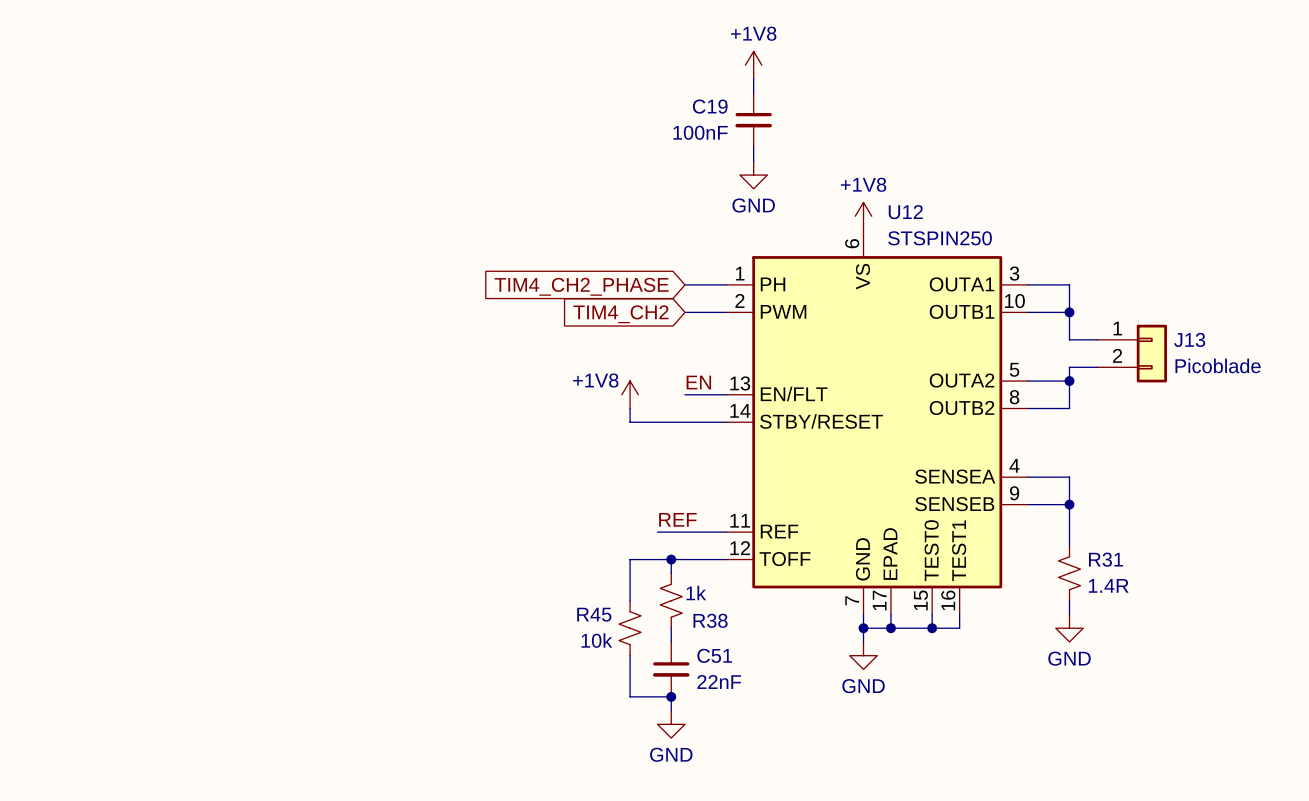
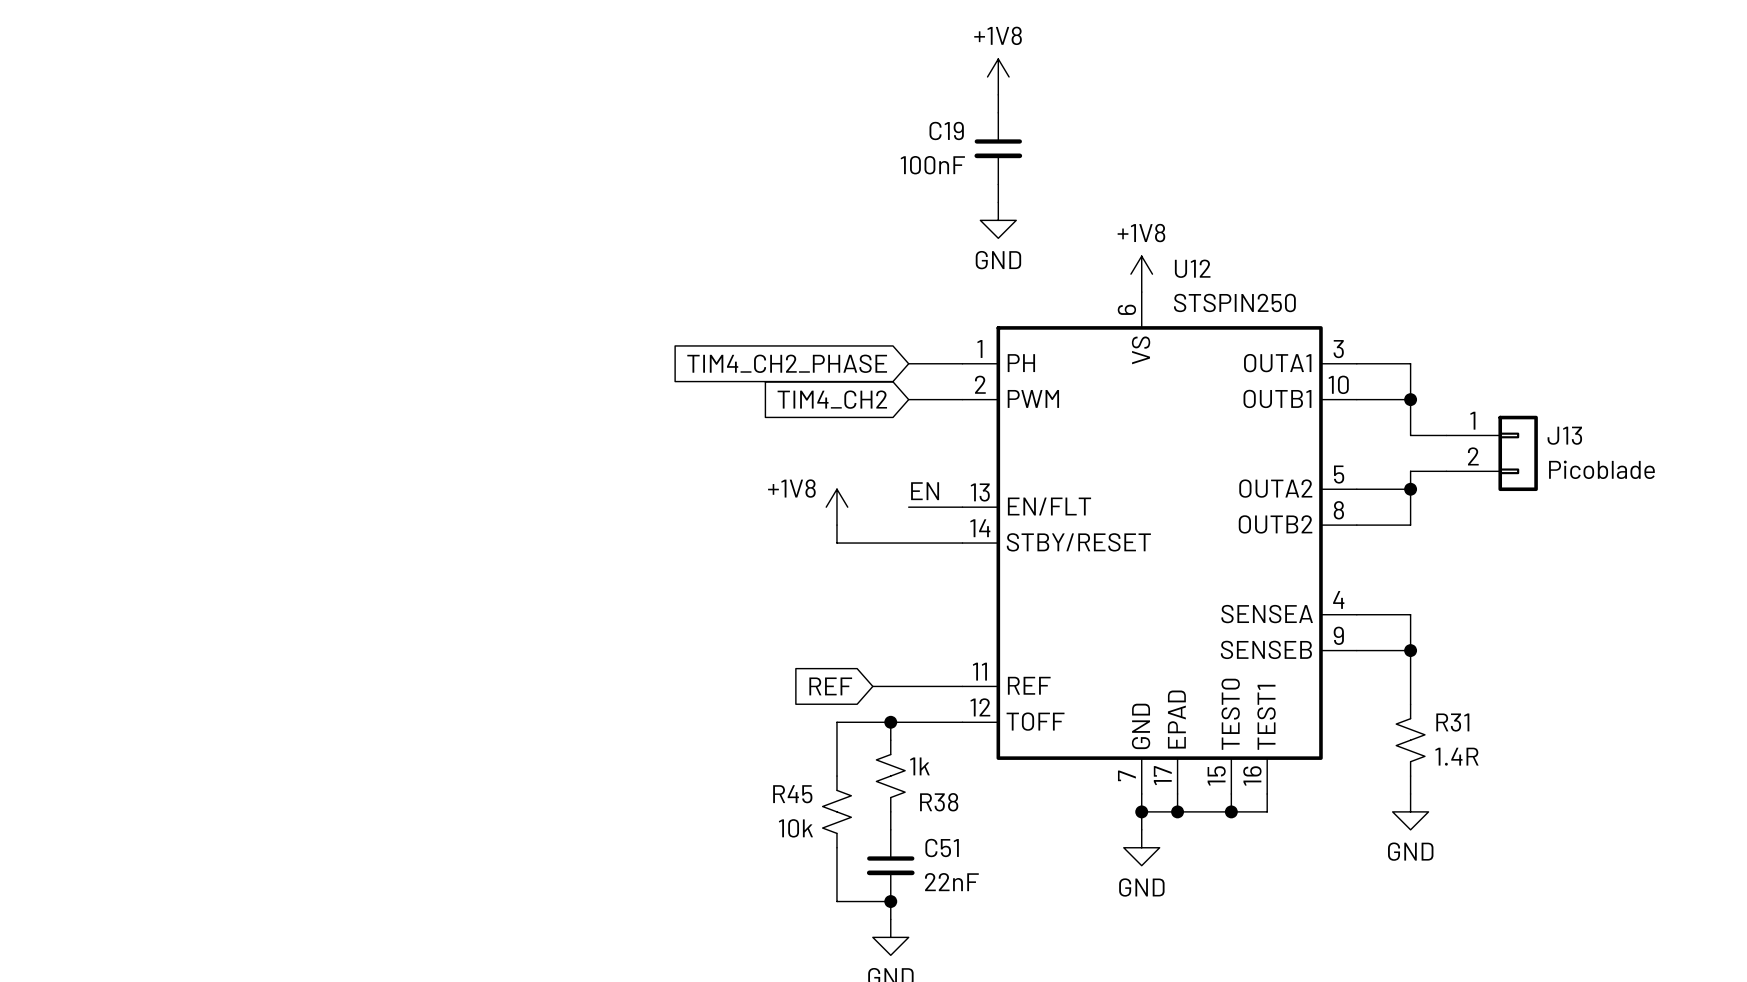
label: REF (677, 519) -> none
global label: none -> REF (830, 686)

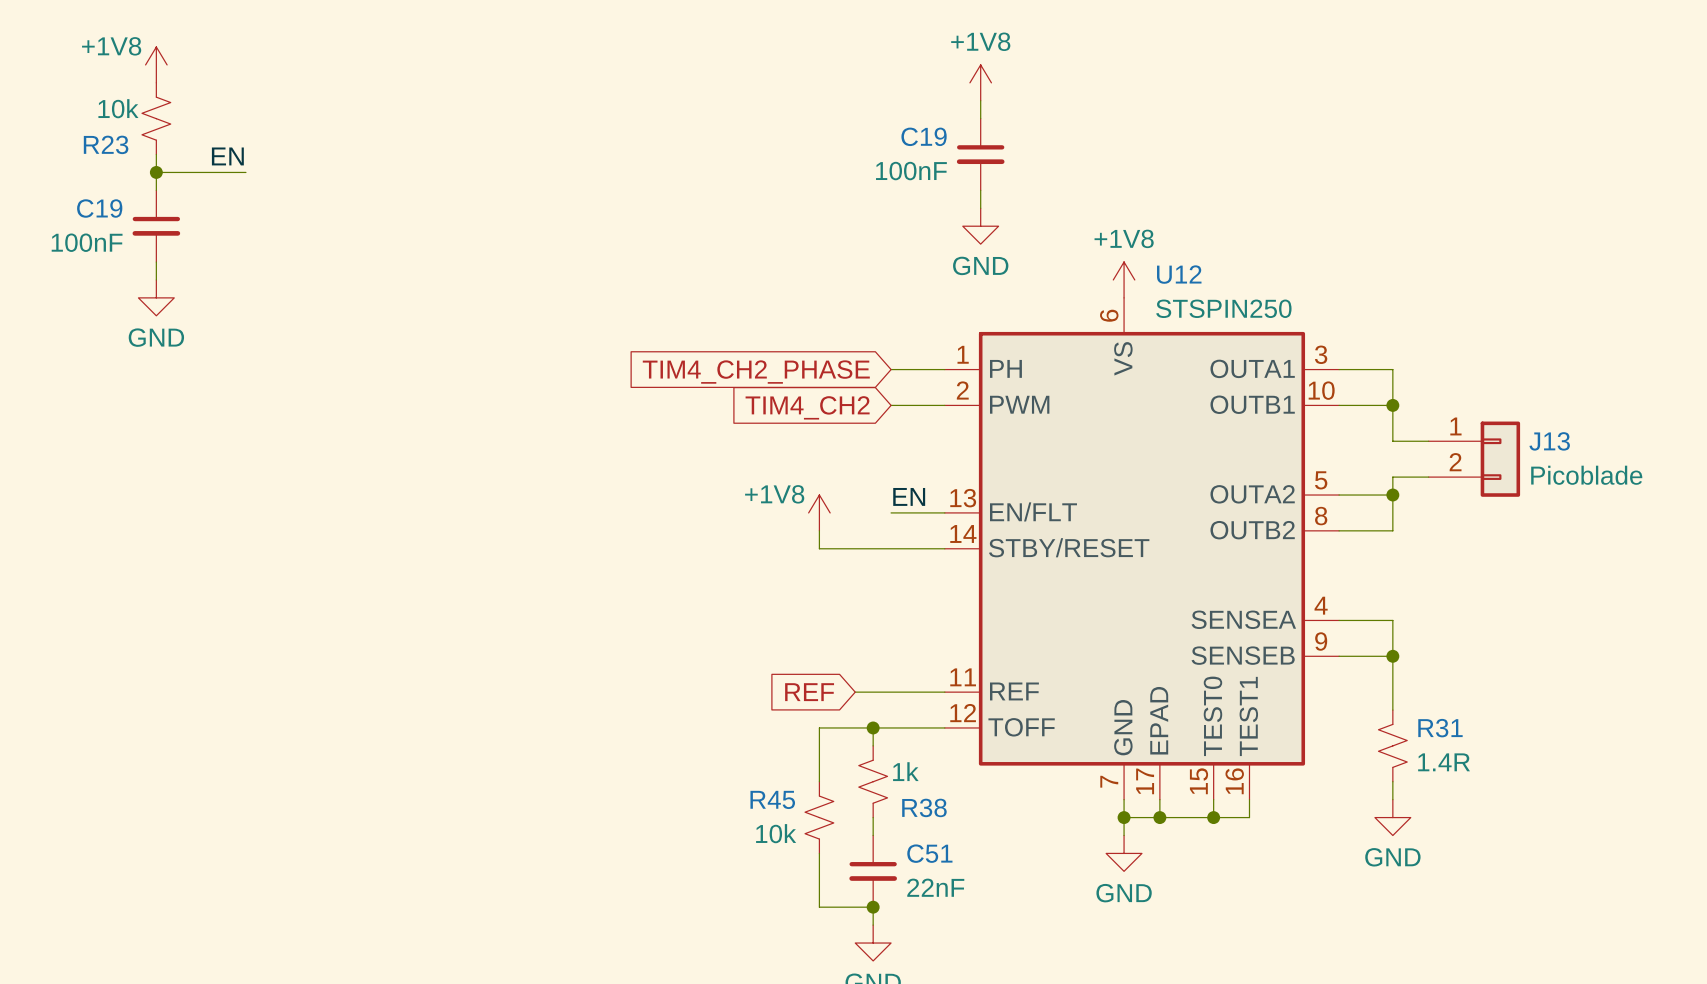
power symbol: none -> +1V8 (156, 64)
R23: none -> 10k (156, 118)
wire: none -> (156, 154) (156, 190)
label: none -> EN (227, 156)
wire: none -> (156, 172) (245, 172)
junction: none -> (156, 172)
C19: none -> 100nF (156, 226)
wire: none -> (156, 262) (156, 279)
power symbol: none -> GND (156, 297)

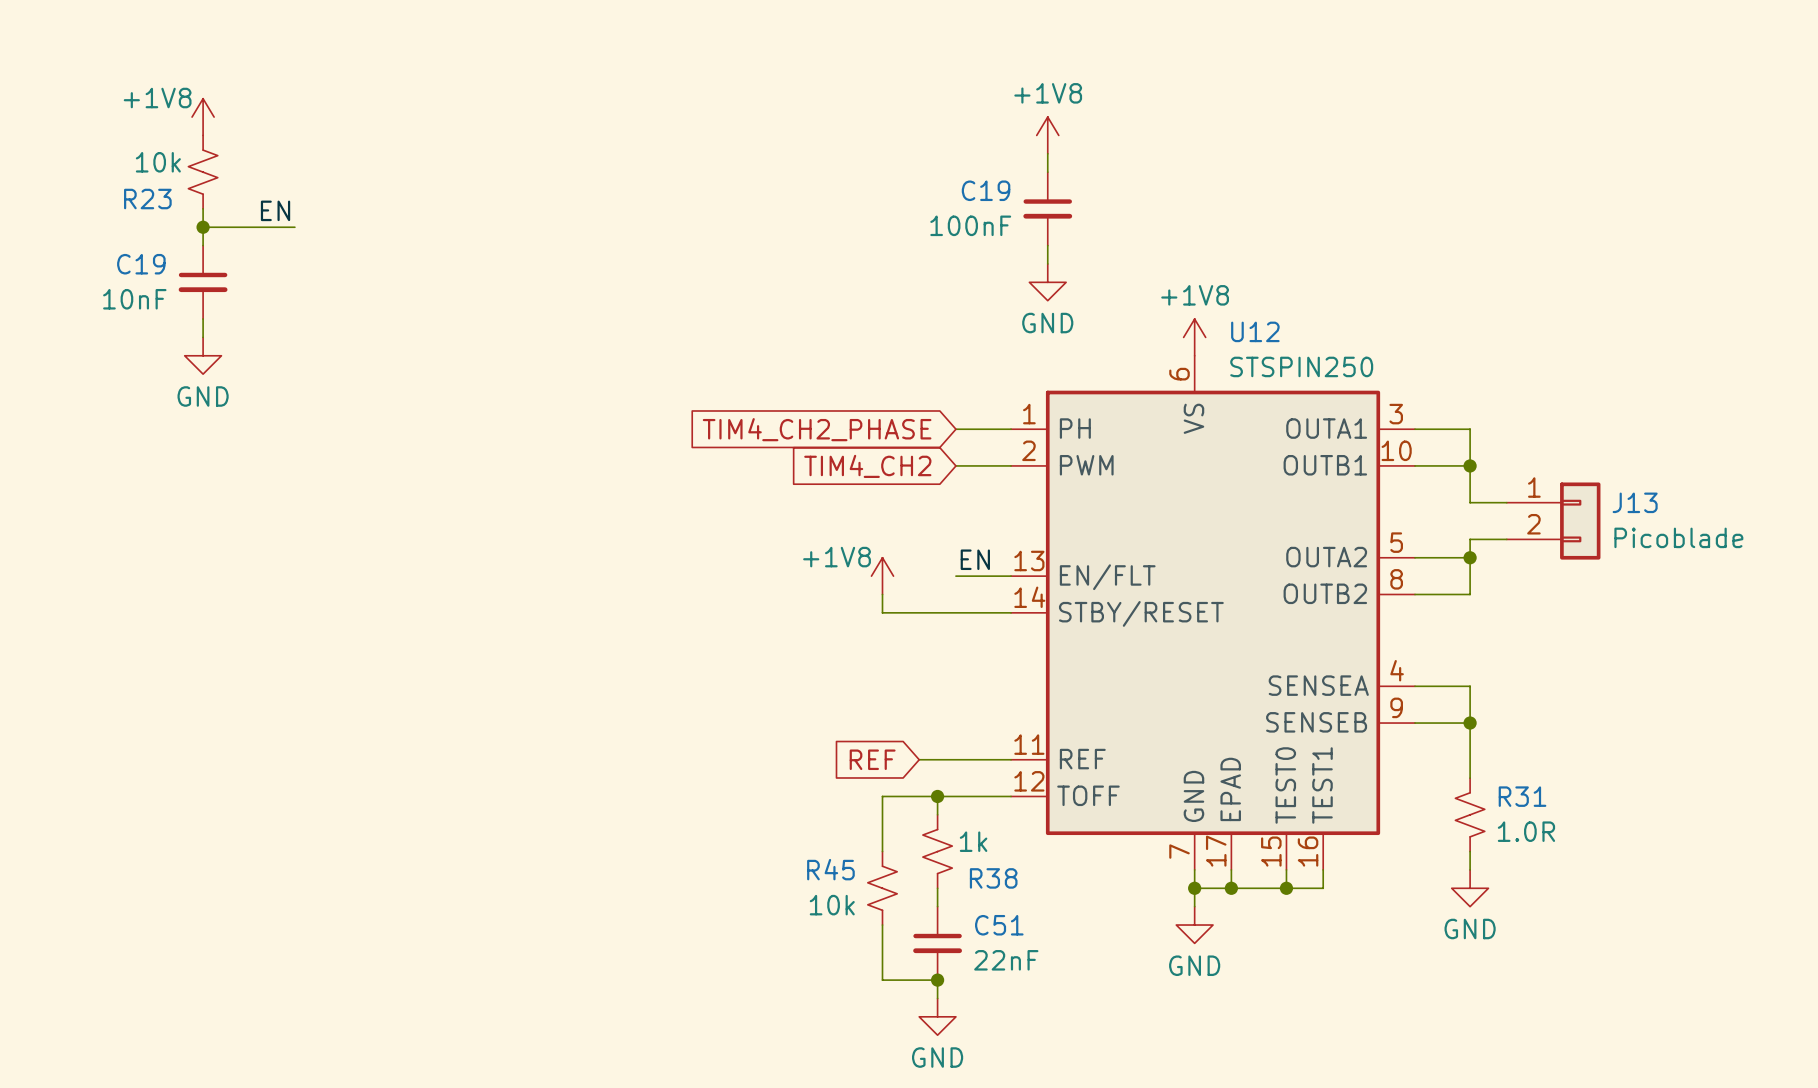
C19 value: 100nF (87, 242) -> 10nF (134, 299)
R31 value: 1.4R (1444, 762) -> 1.0R (1526, 831)

